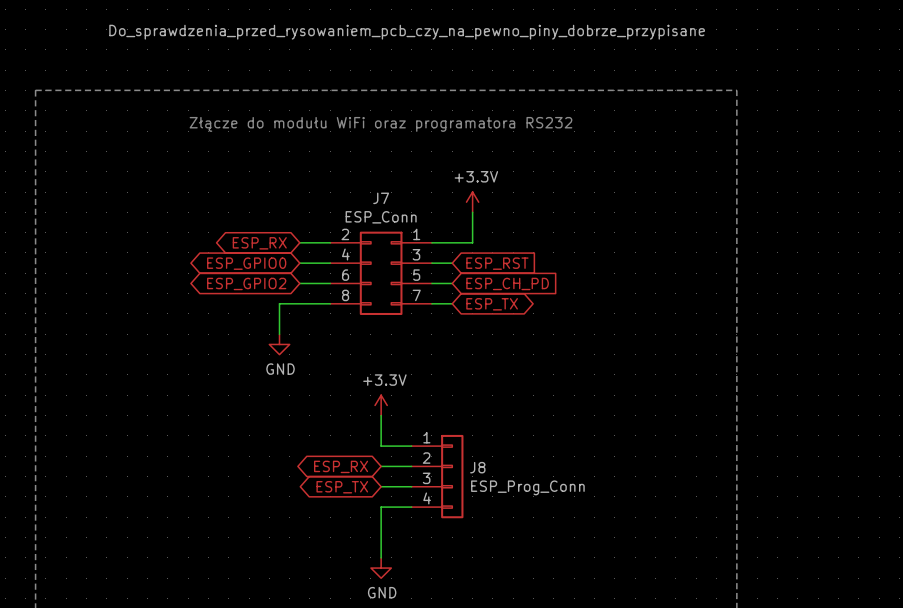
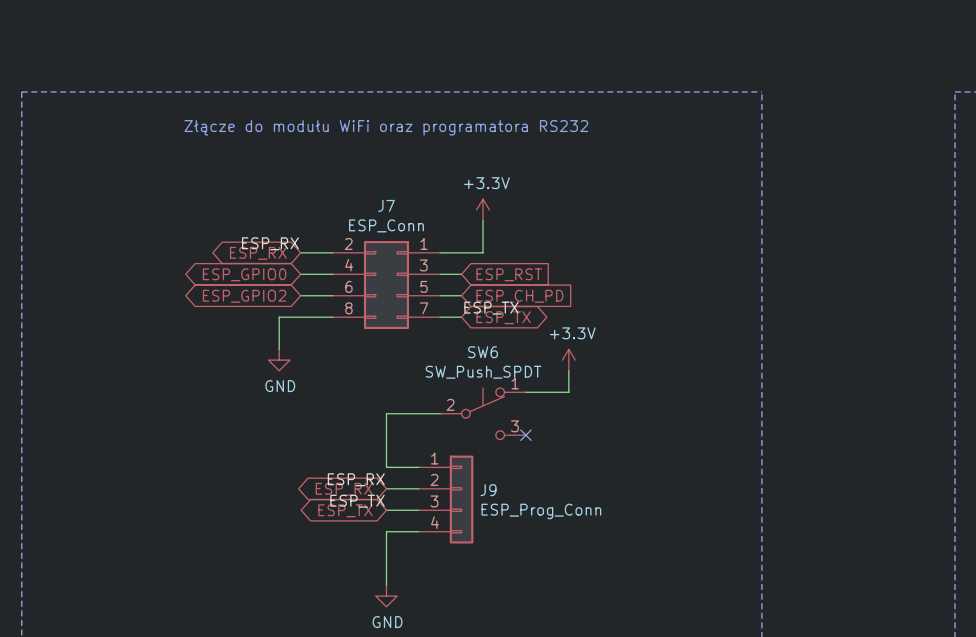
label: Do_sprawdzenia_przed_rysowaniem_pcb_czy_na_pewno_piny_dobrze_przypisane (407, 32) -> none
label: none -> ESP_RX (270, 243)
label: none -> ESP_TX (491, 308)
wire: none -> (568, 370) (568, 392) (525, 392)
wire: none -> (440, 413) (386, 413) (386, 435)
SW6: none -> SW_Push_SPDT (483, 413)
power symbol position: +3.3V (381, 405) -> +3.3V (568, 360)
no-connect mark: none -> (525, 435)
label: none -> ESP_RX (356, 479)
J8 name: J8 (477, 467) -> J9 (488, 490)
label: none -> ESP_TX (357, 501)

